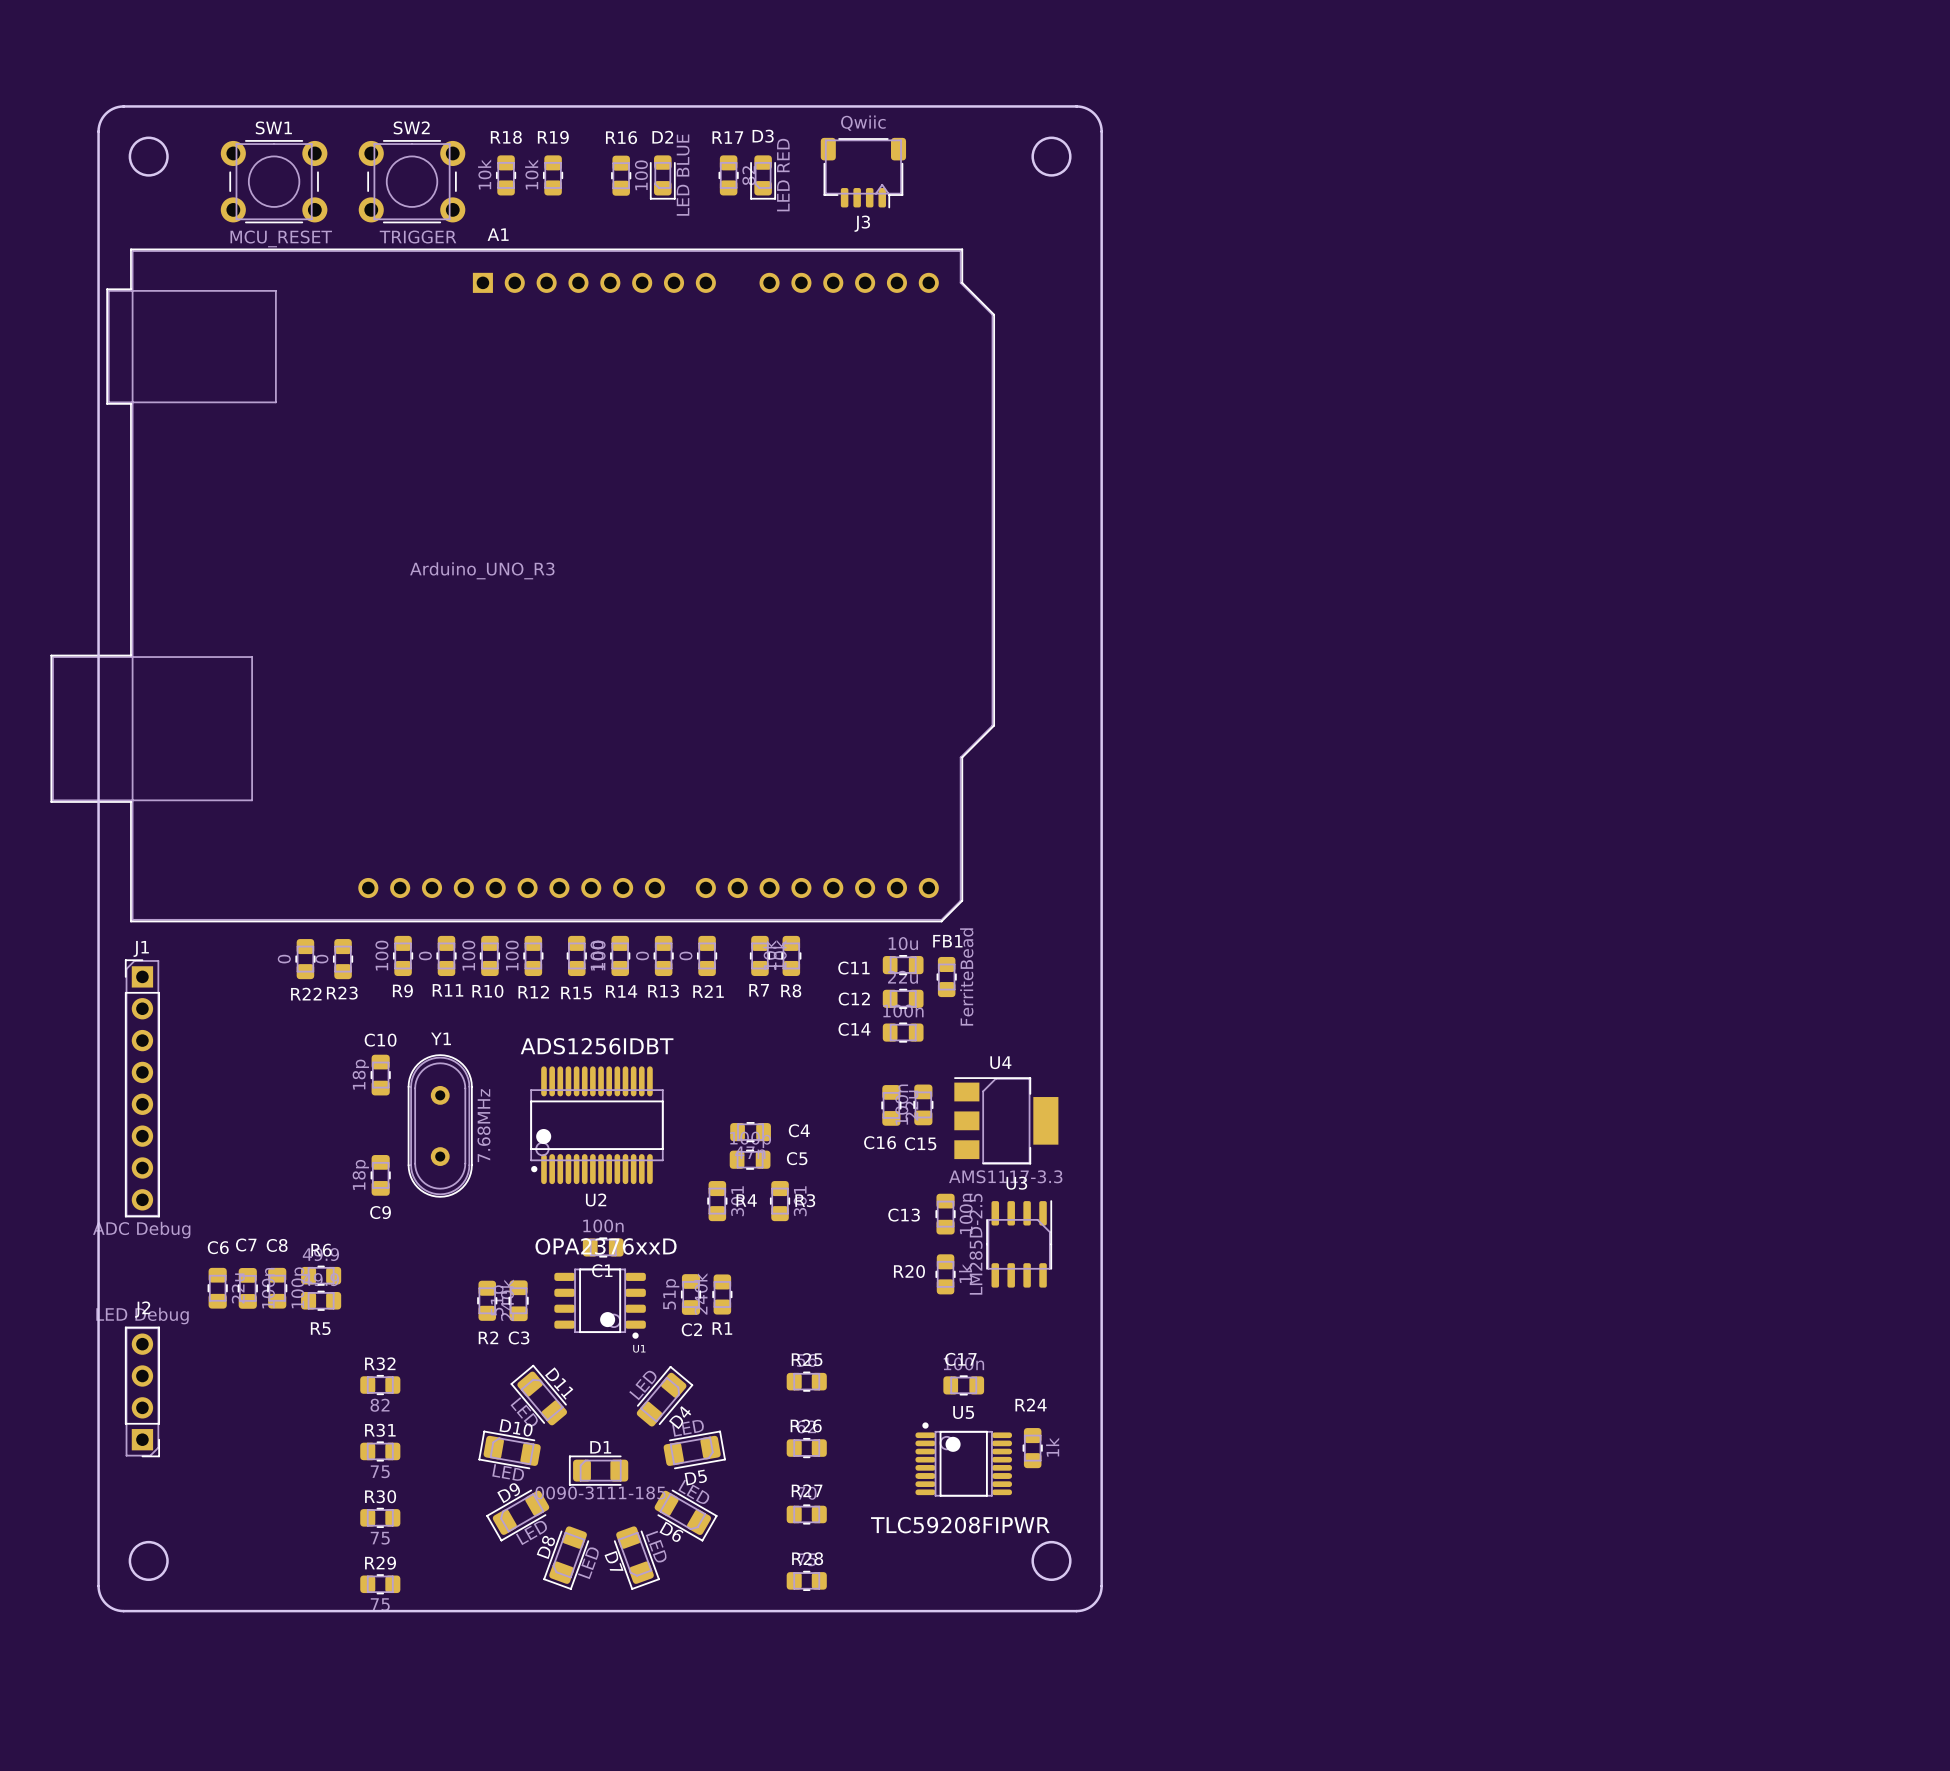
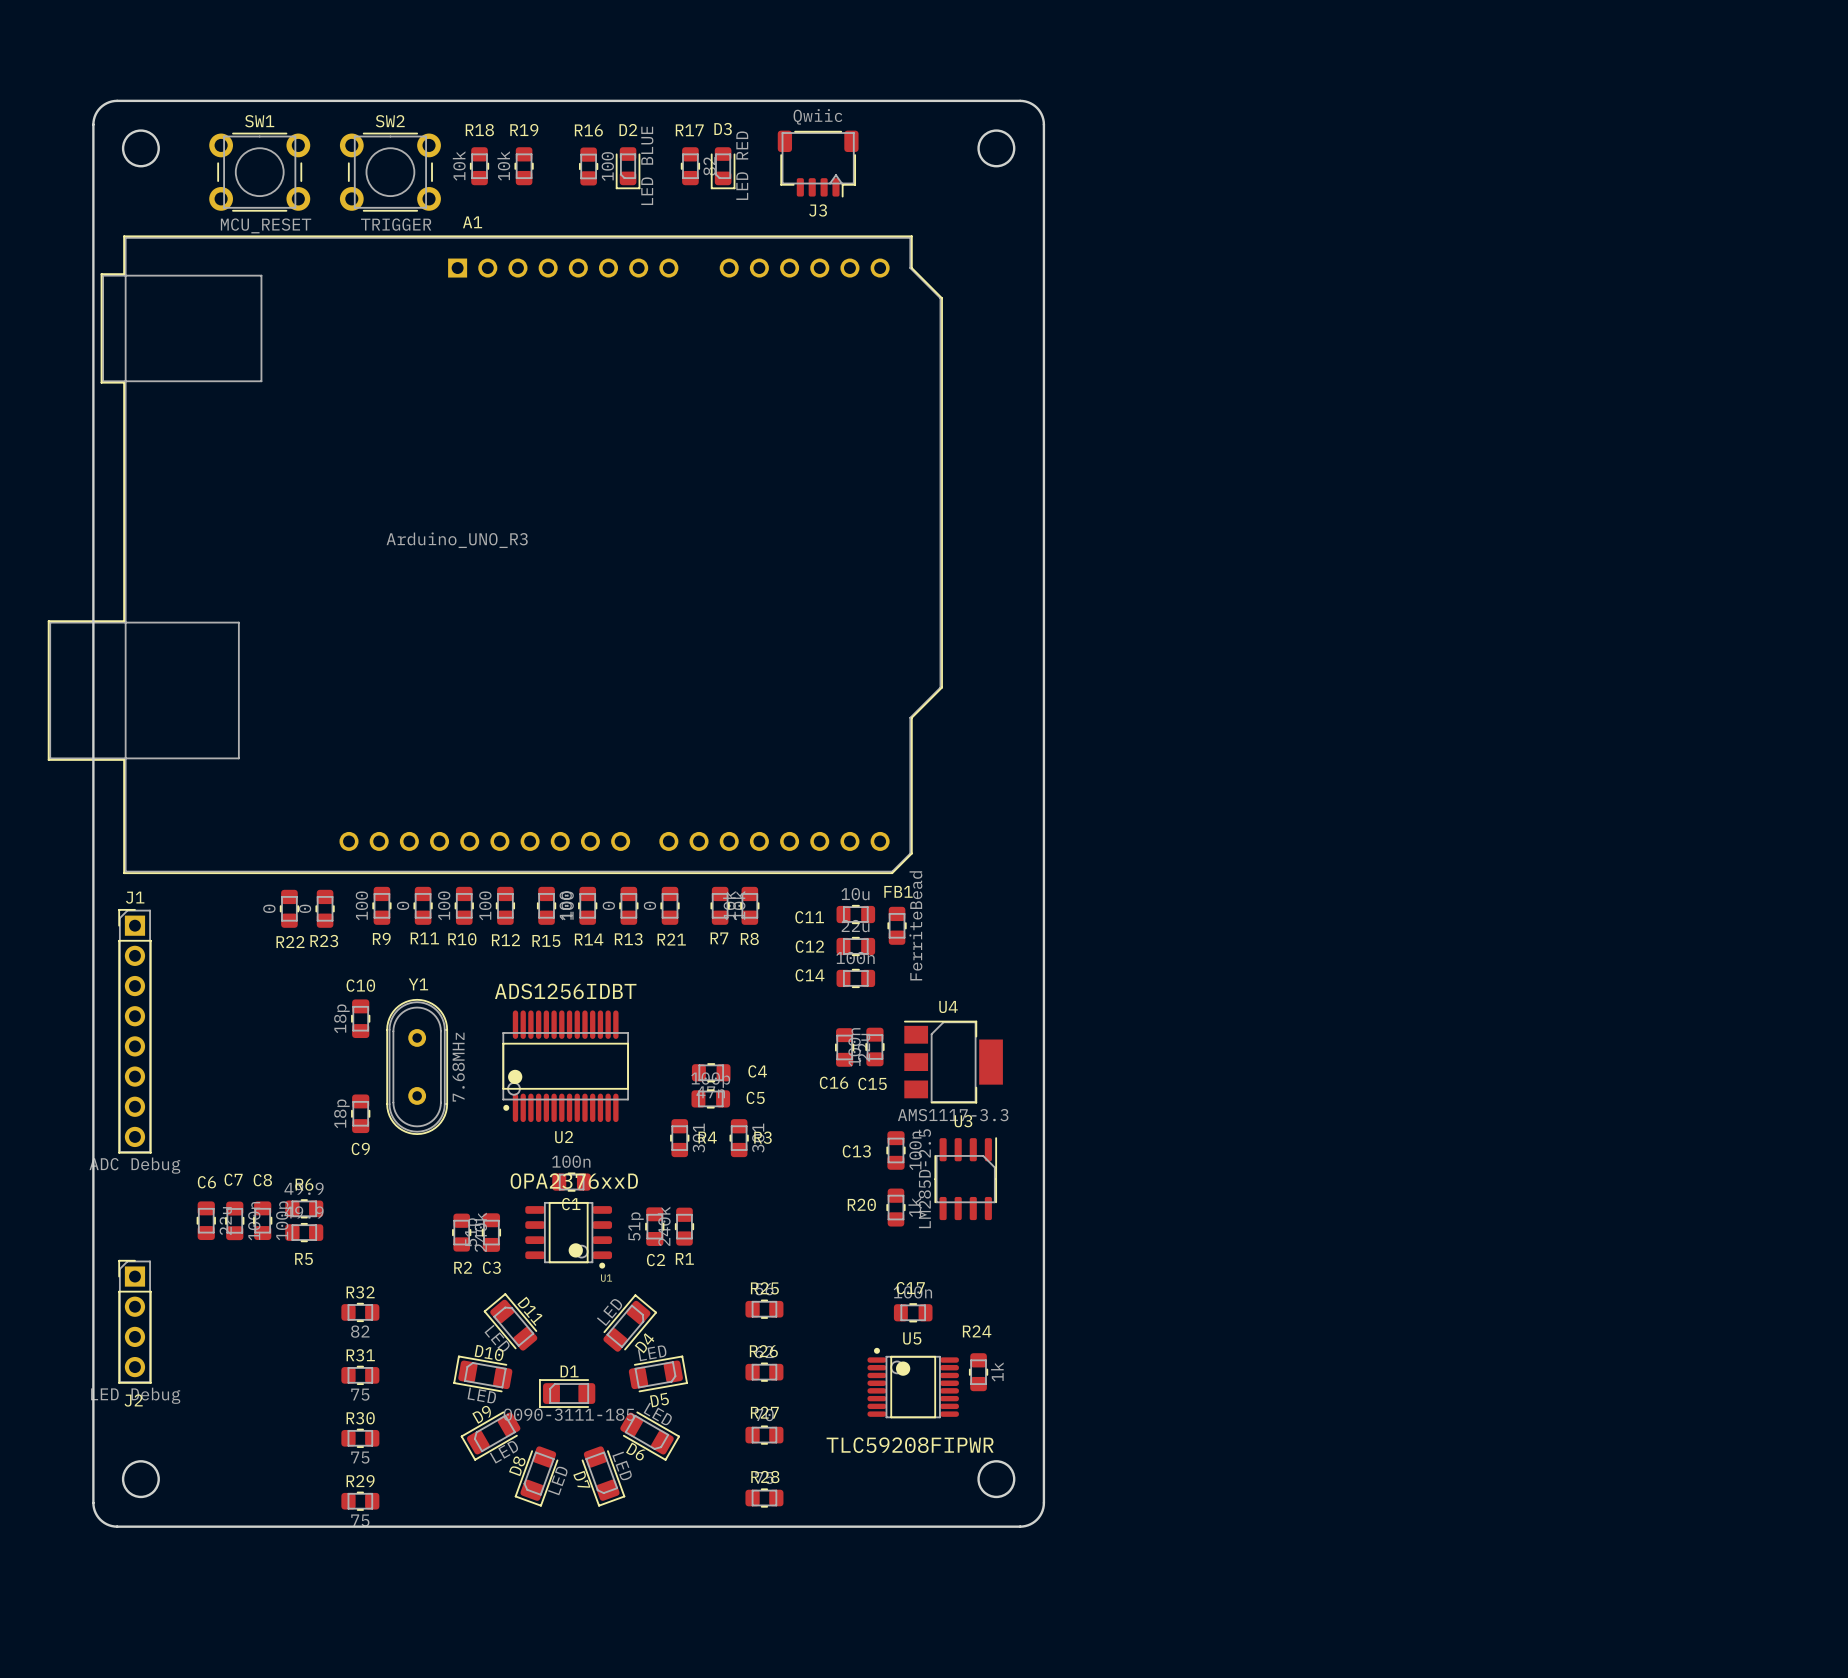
J2 rotation: 0° (142, 1391) -> 180° (134, 1321)

